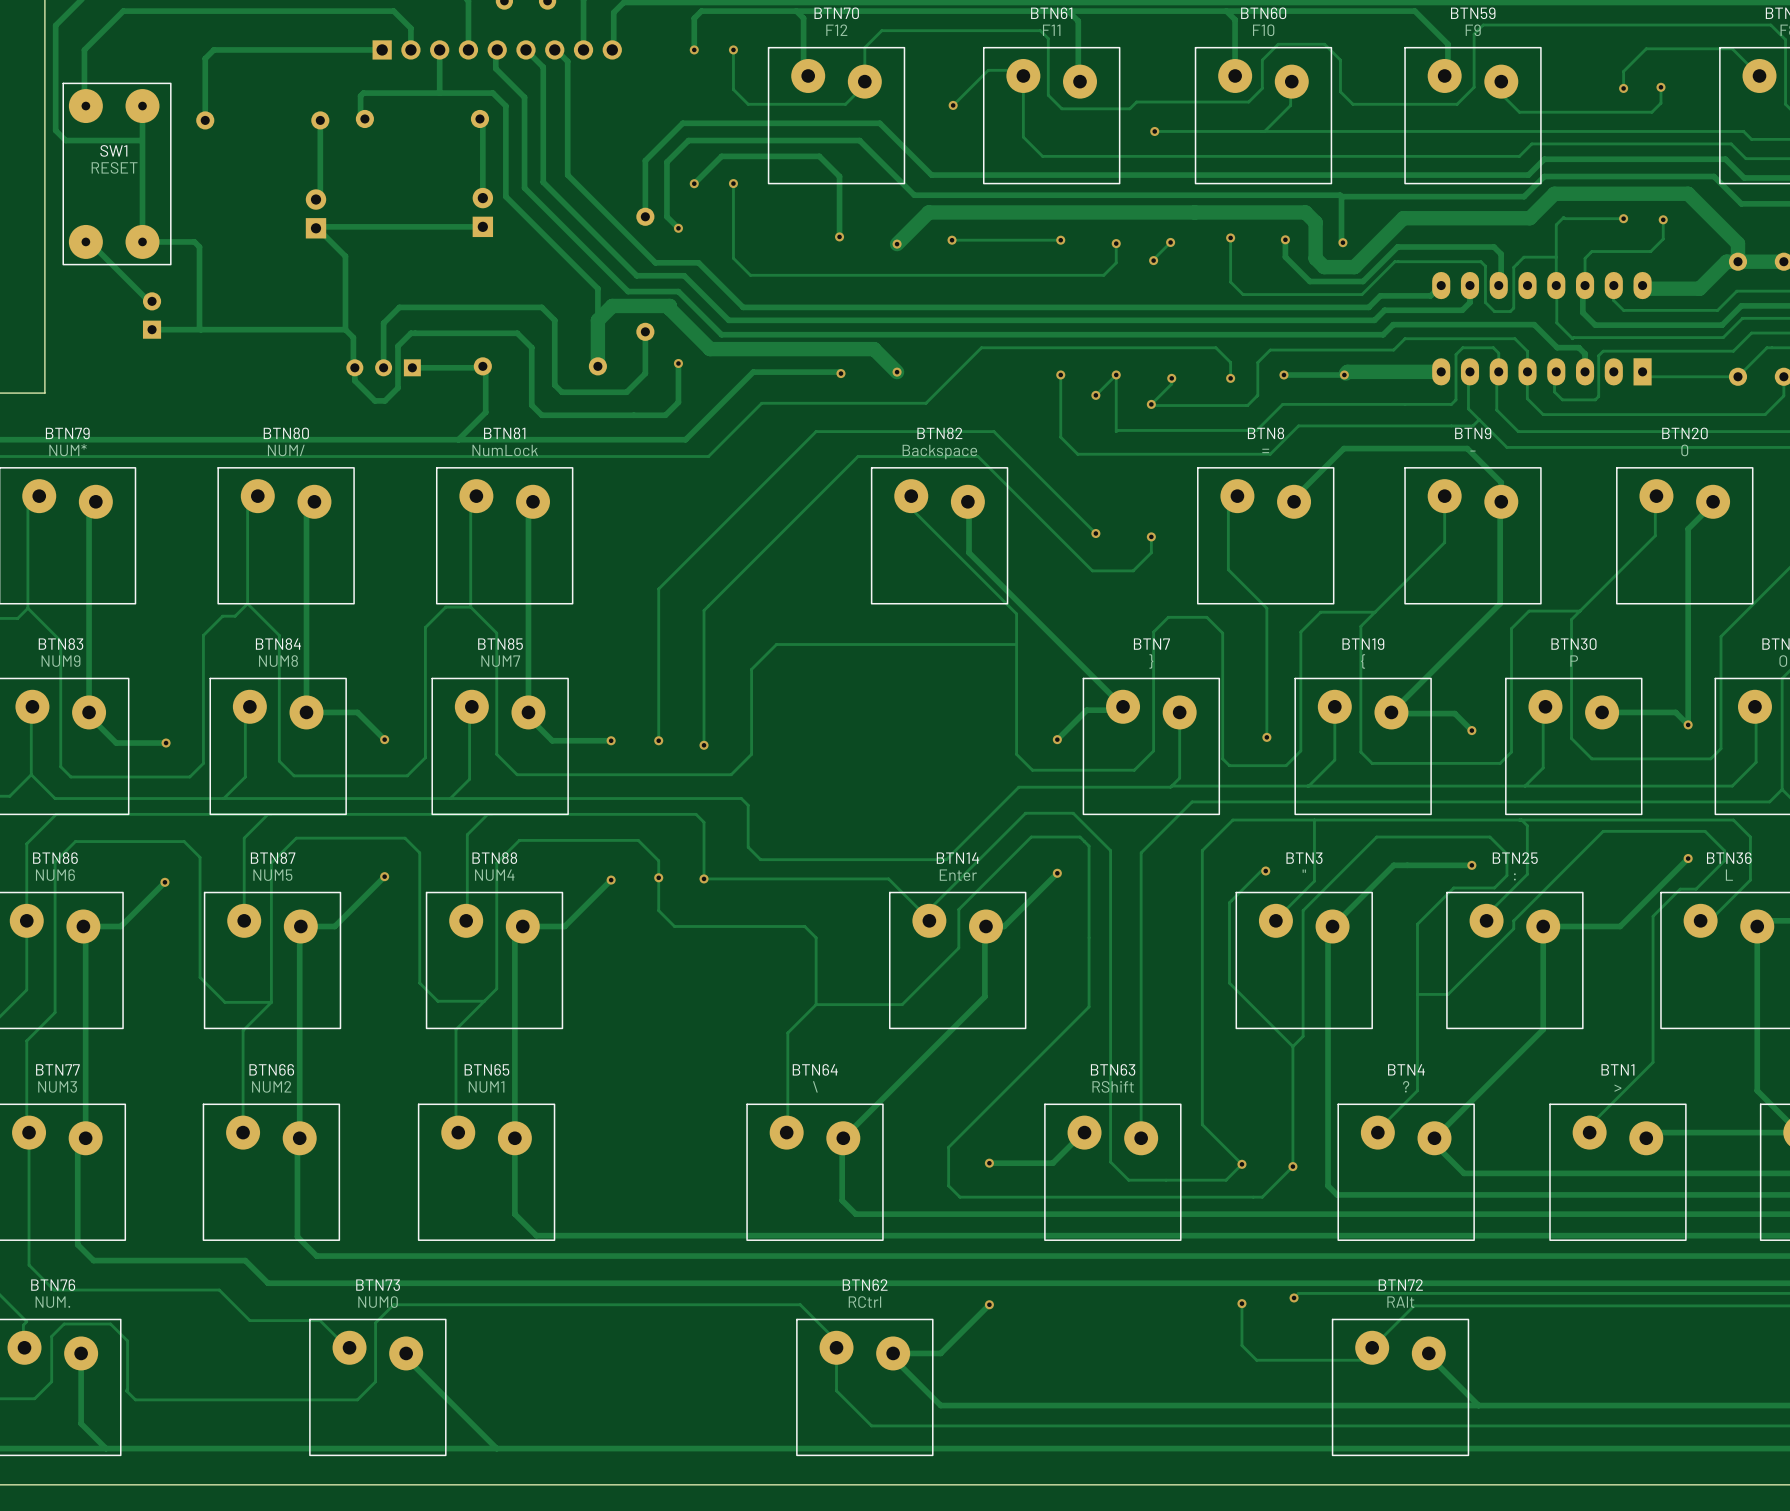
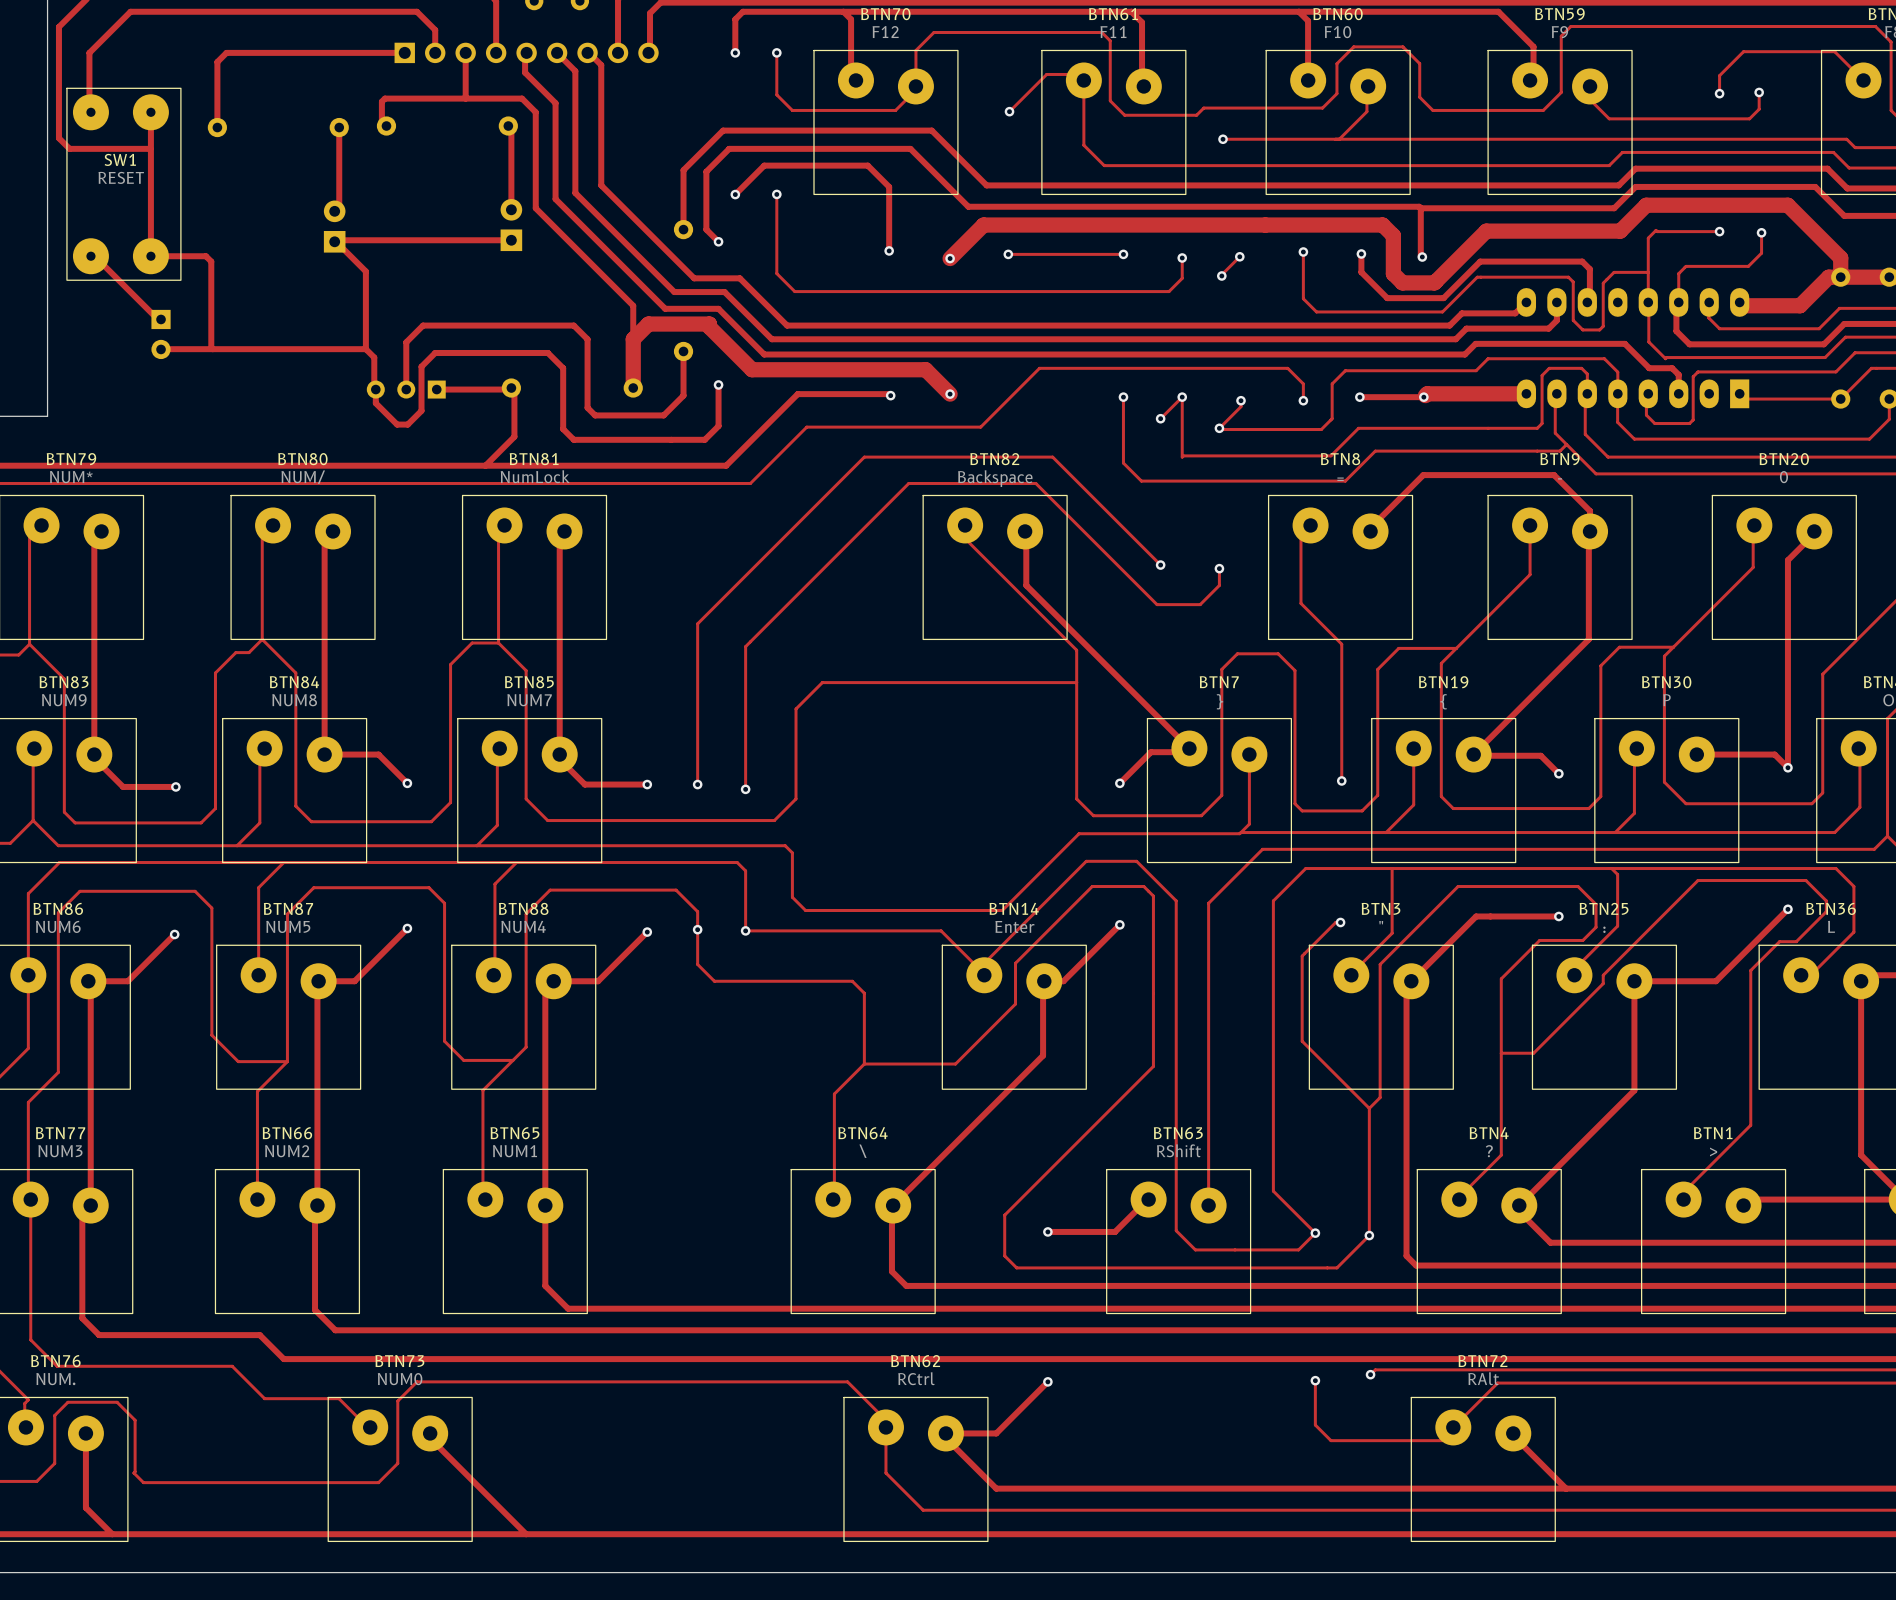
part rotation: 0° (152, 315) -> 180° (161, 334)

